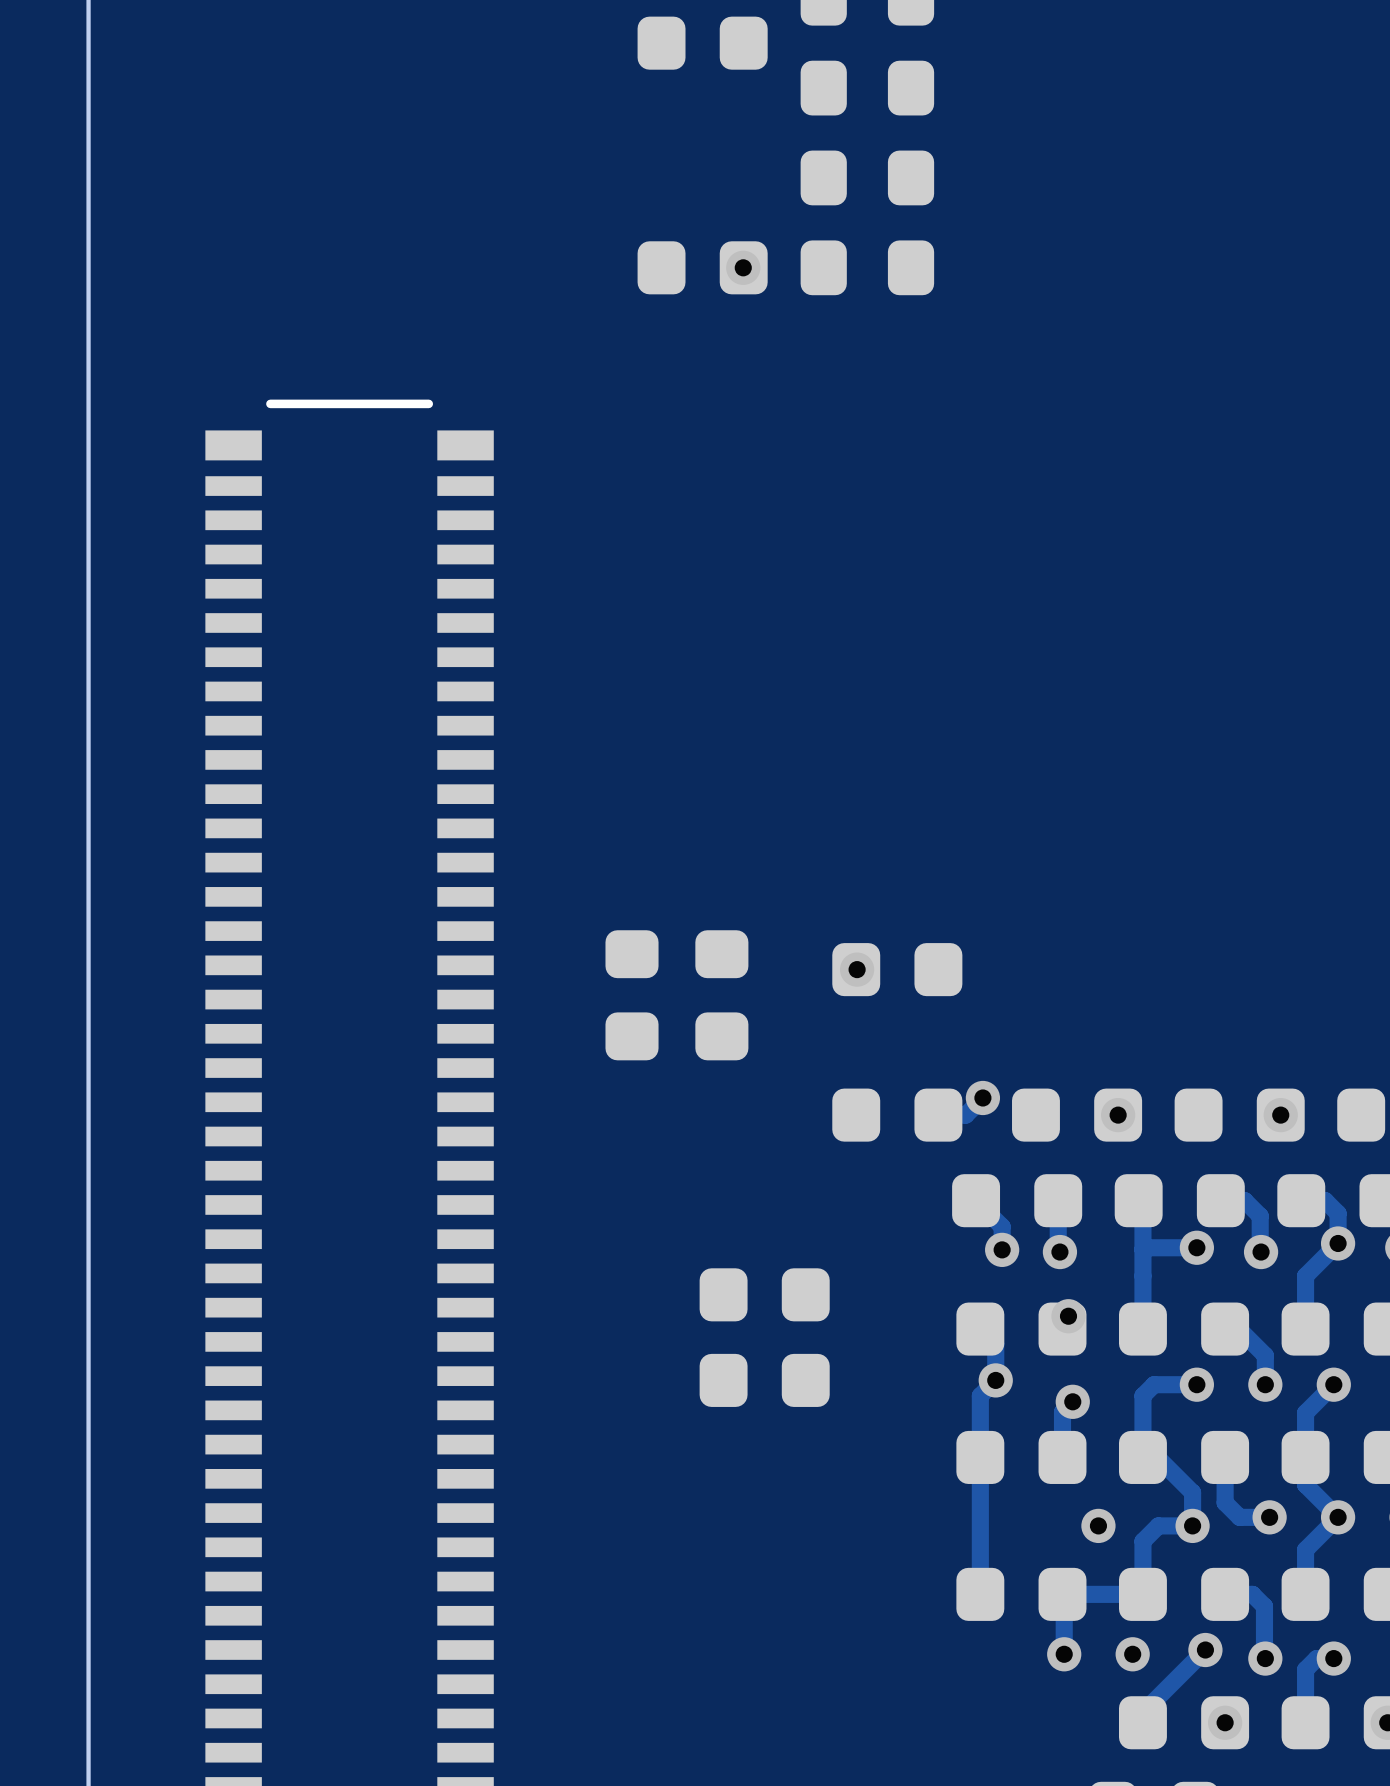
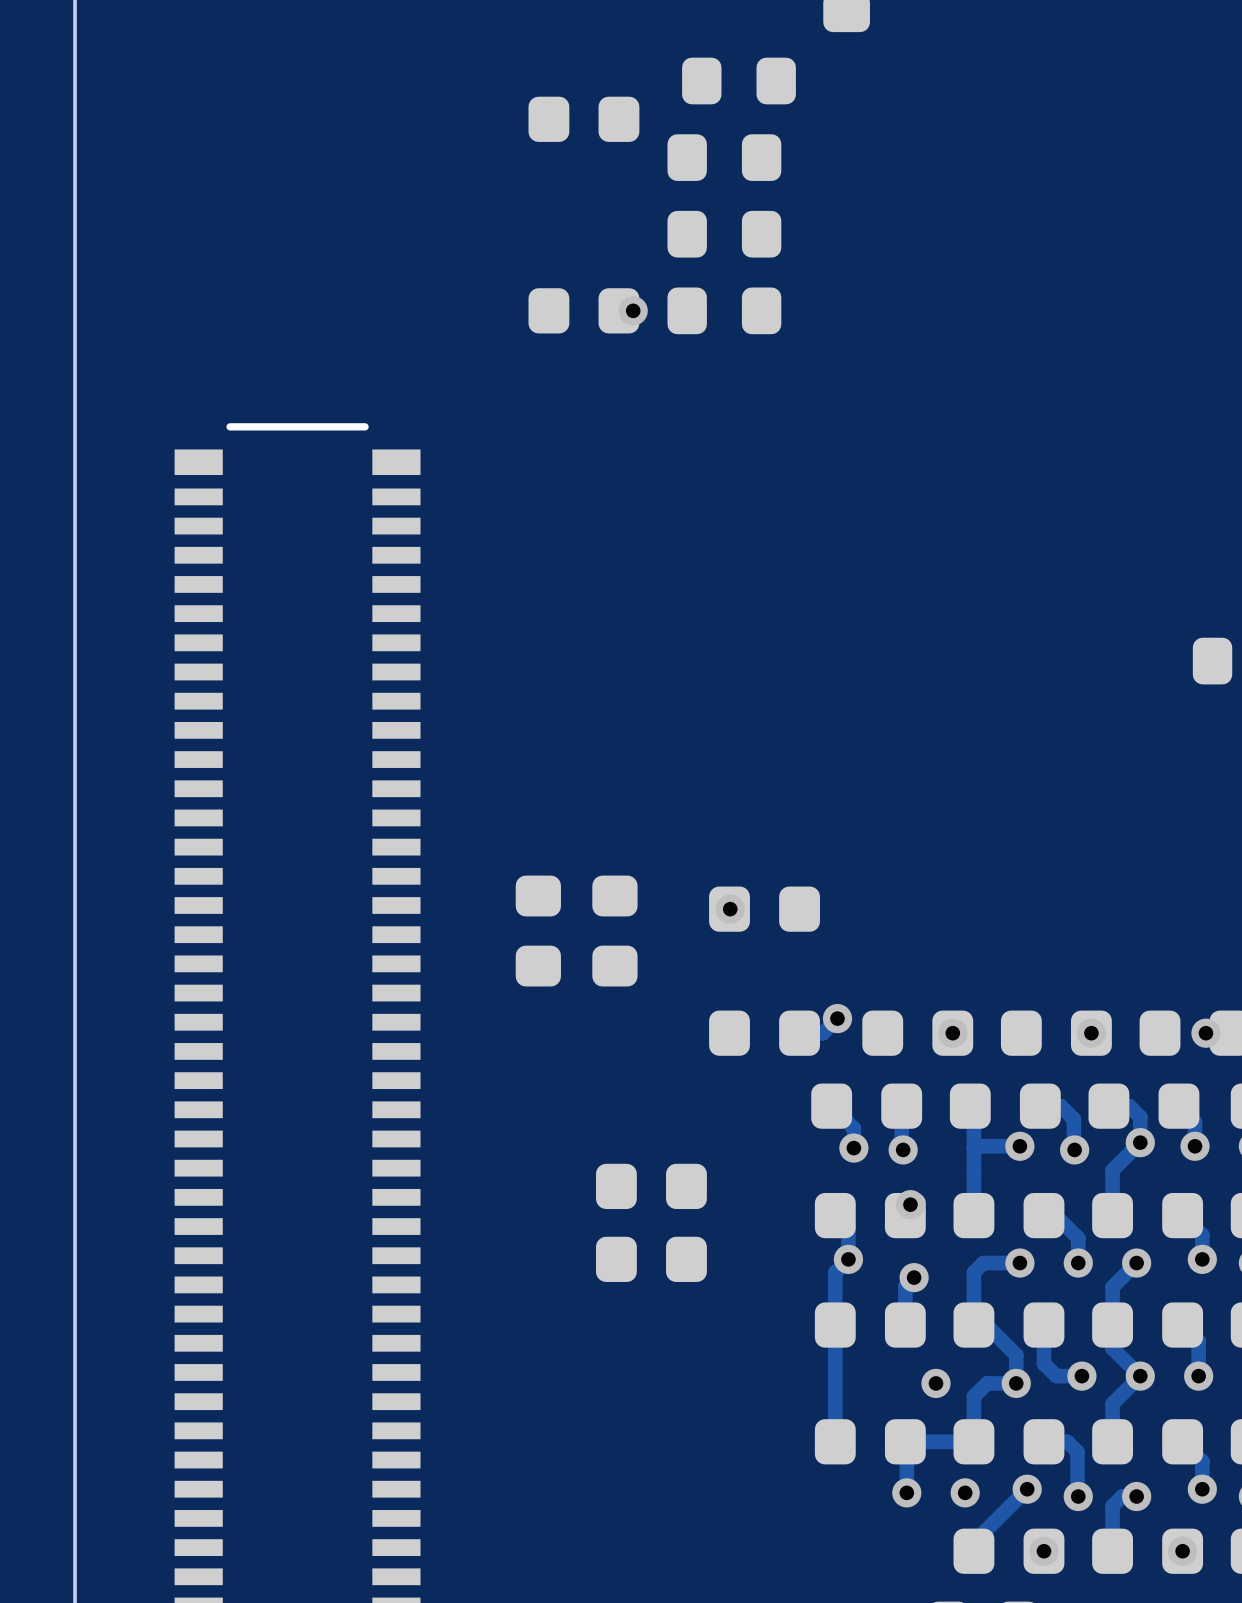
part position: (702, 43) -> (583, 119)
part position: (867, 88) -> (724, 157)
part position: (867, 177) -> (724, 234)
part position: (702, 267) -> (583, 310)
part position: (867, 267) -> (724, 310)

